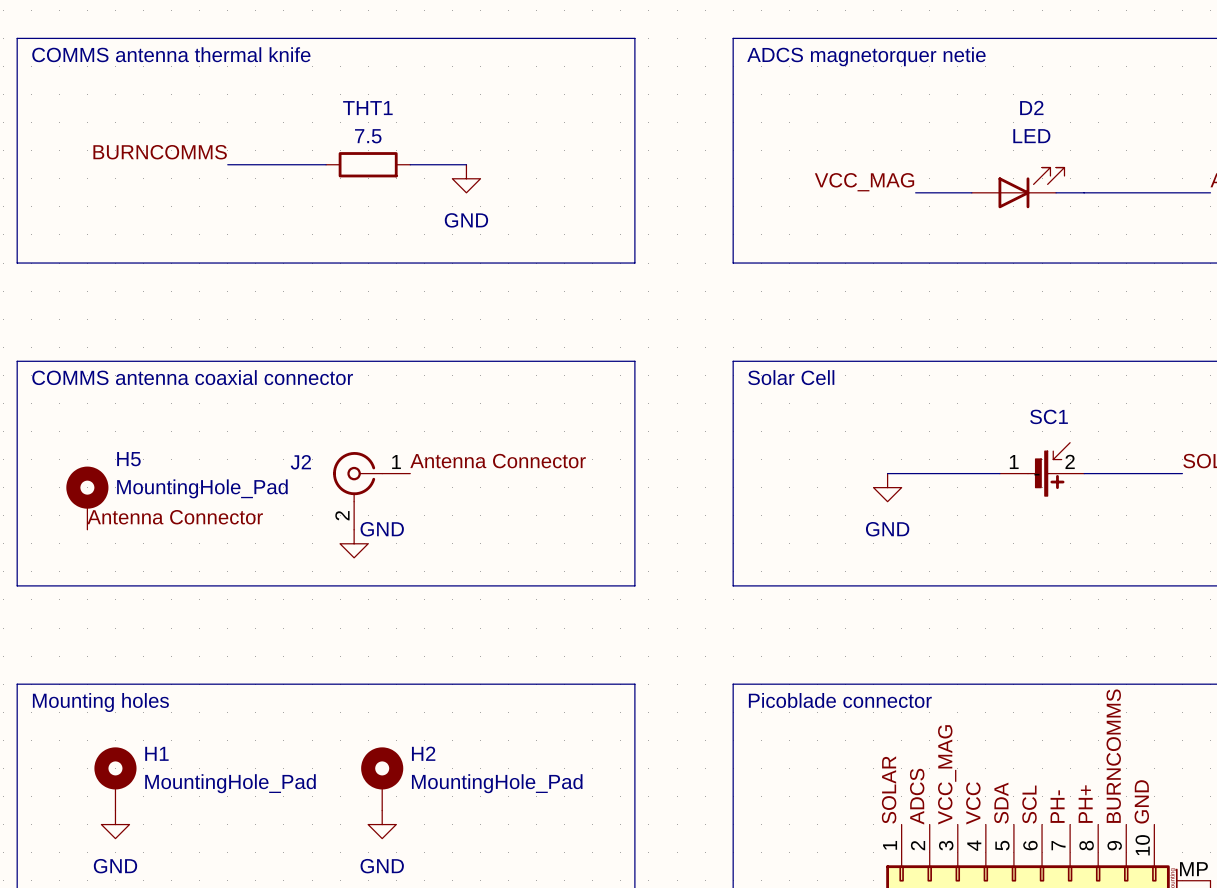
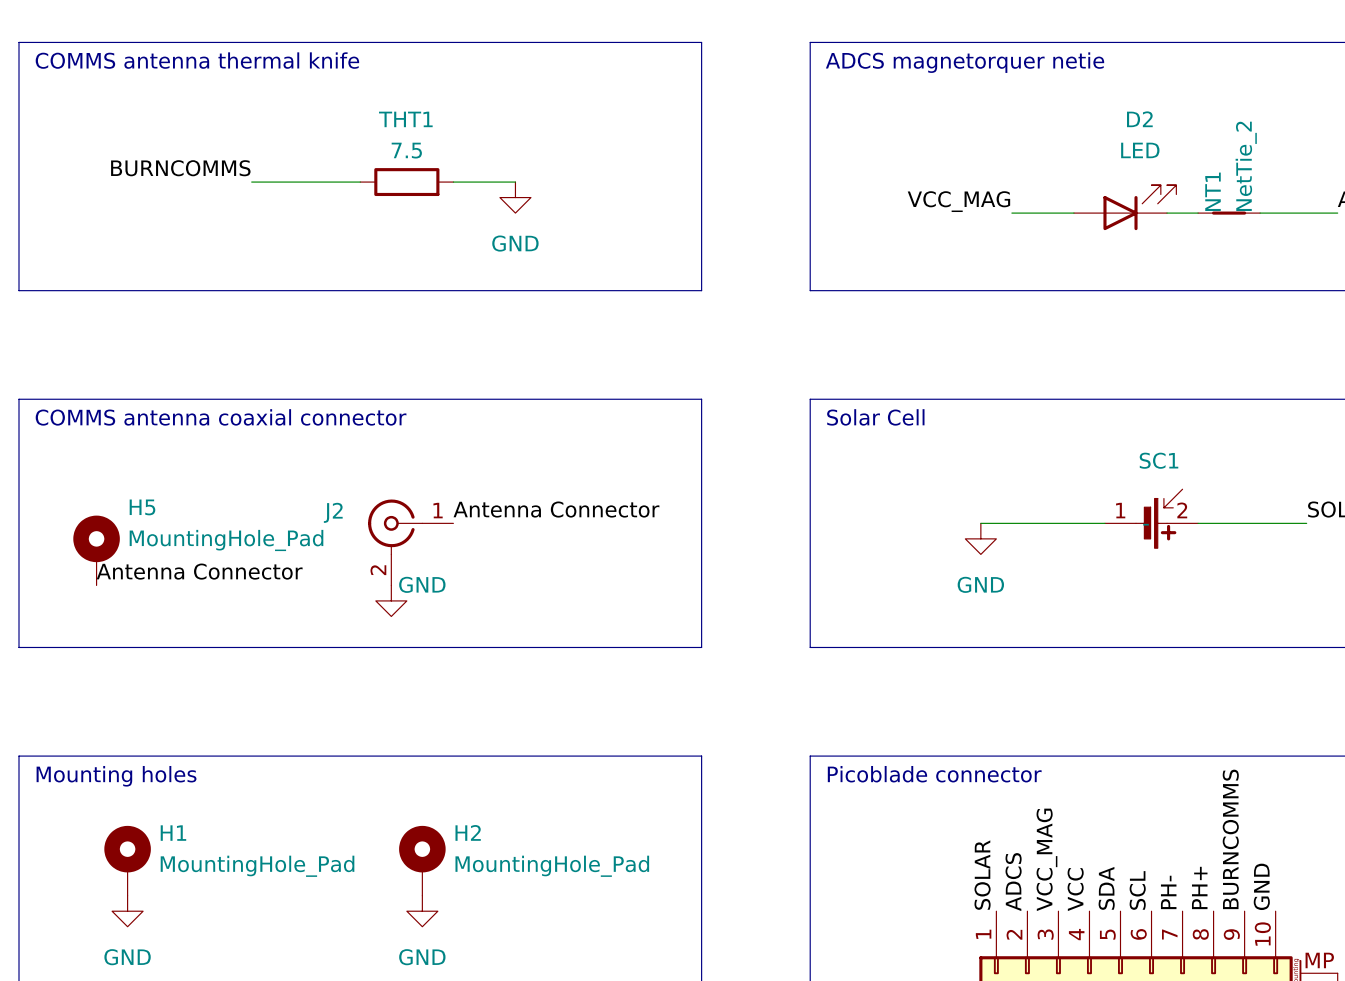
NT1: none -> NetTie_2 (1229, 213)

